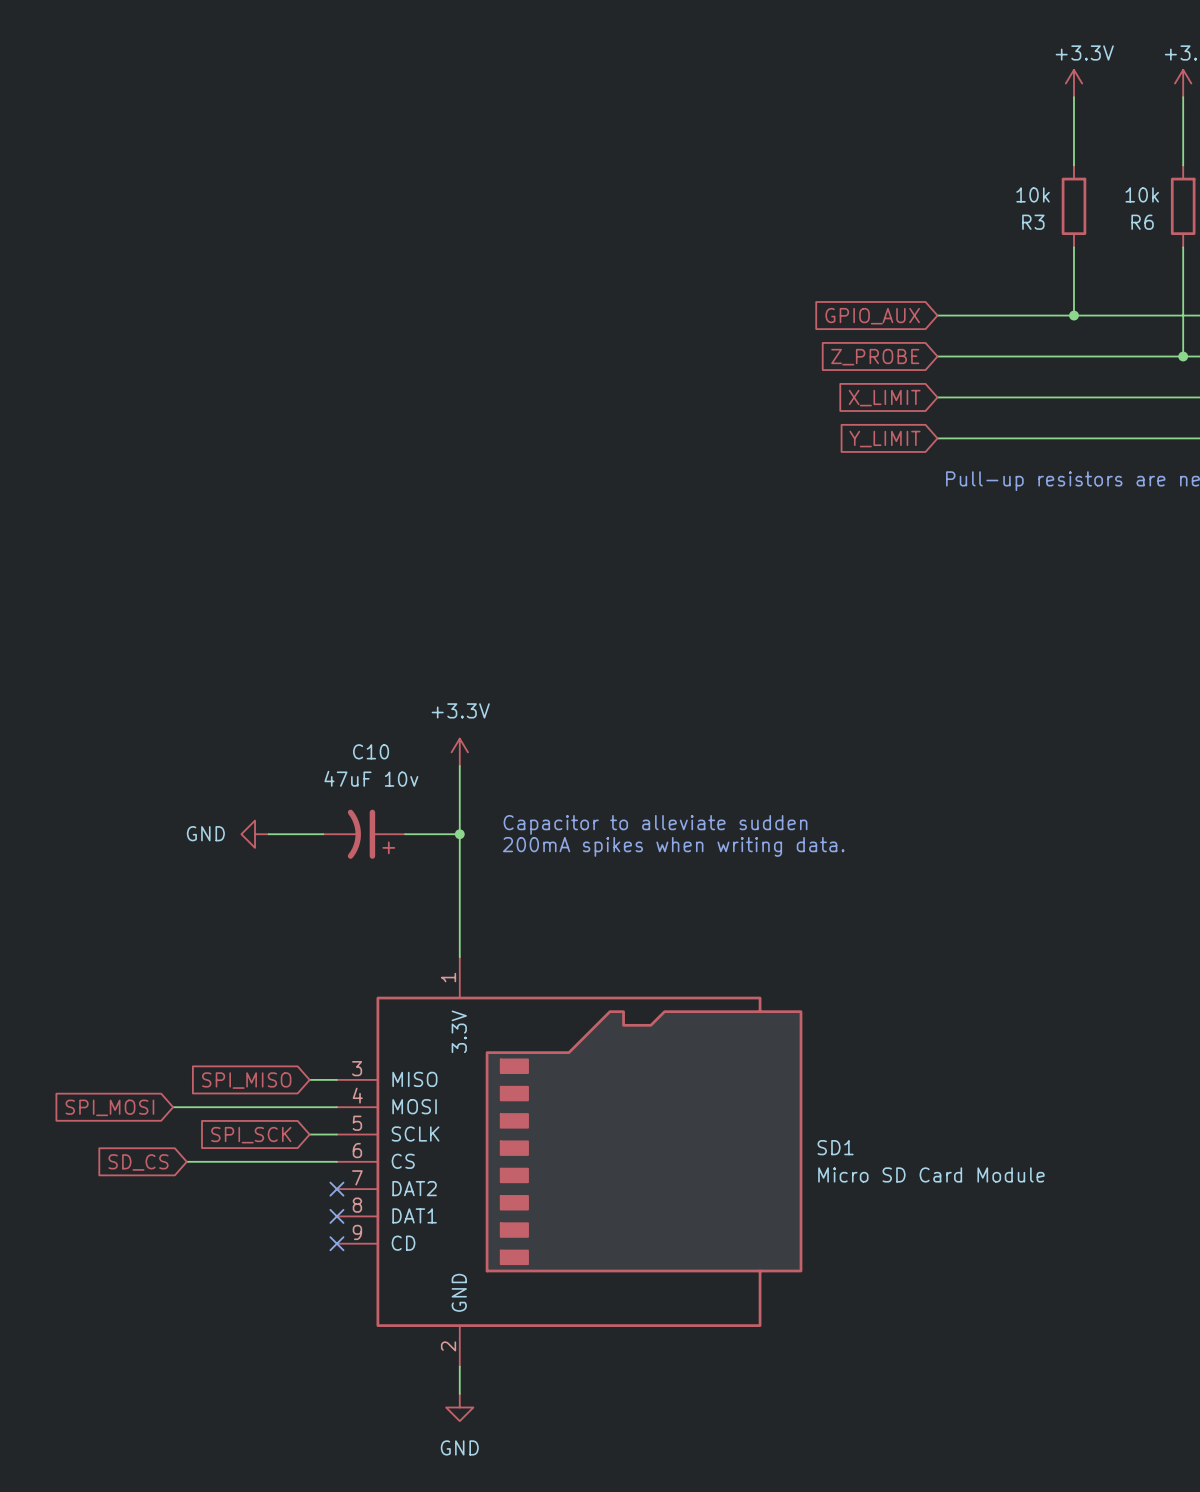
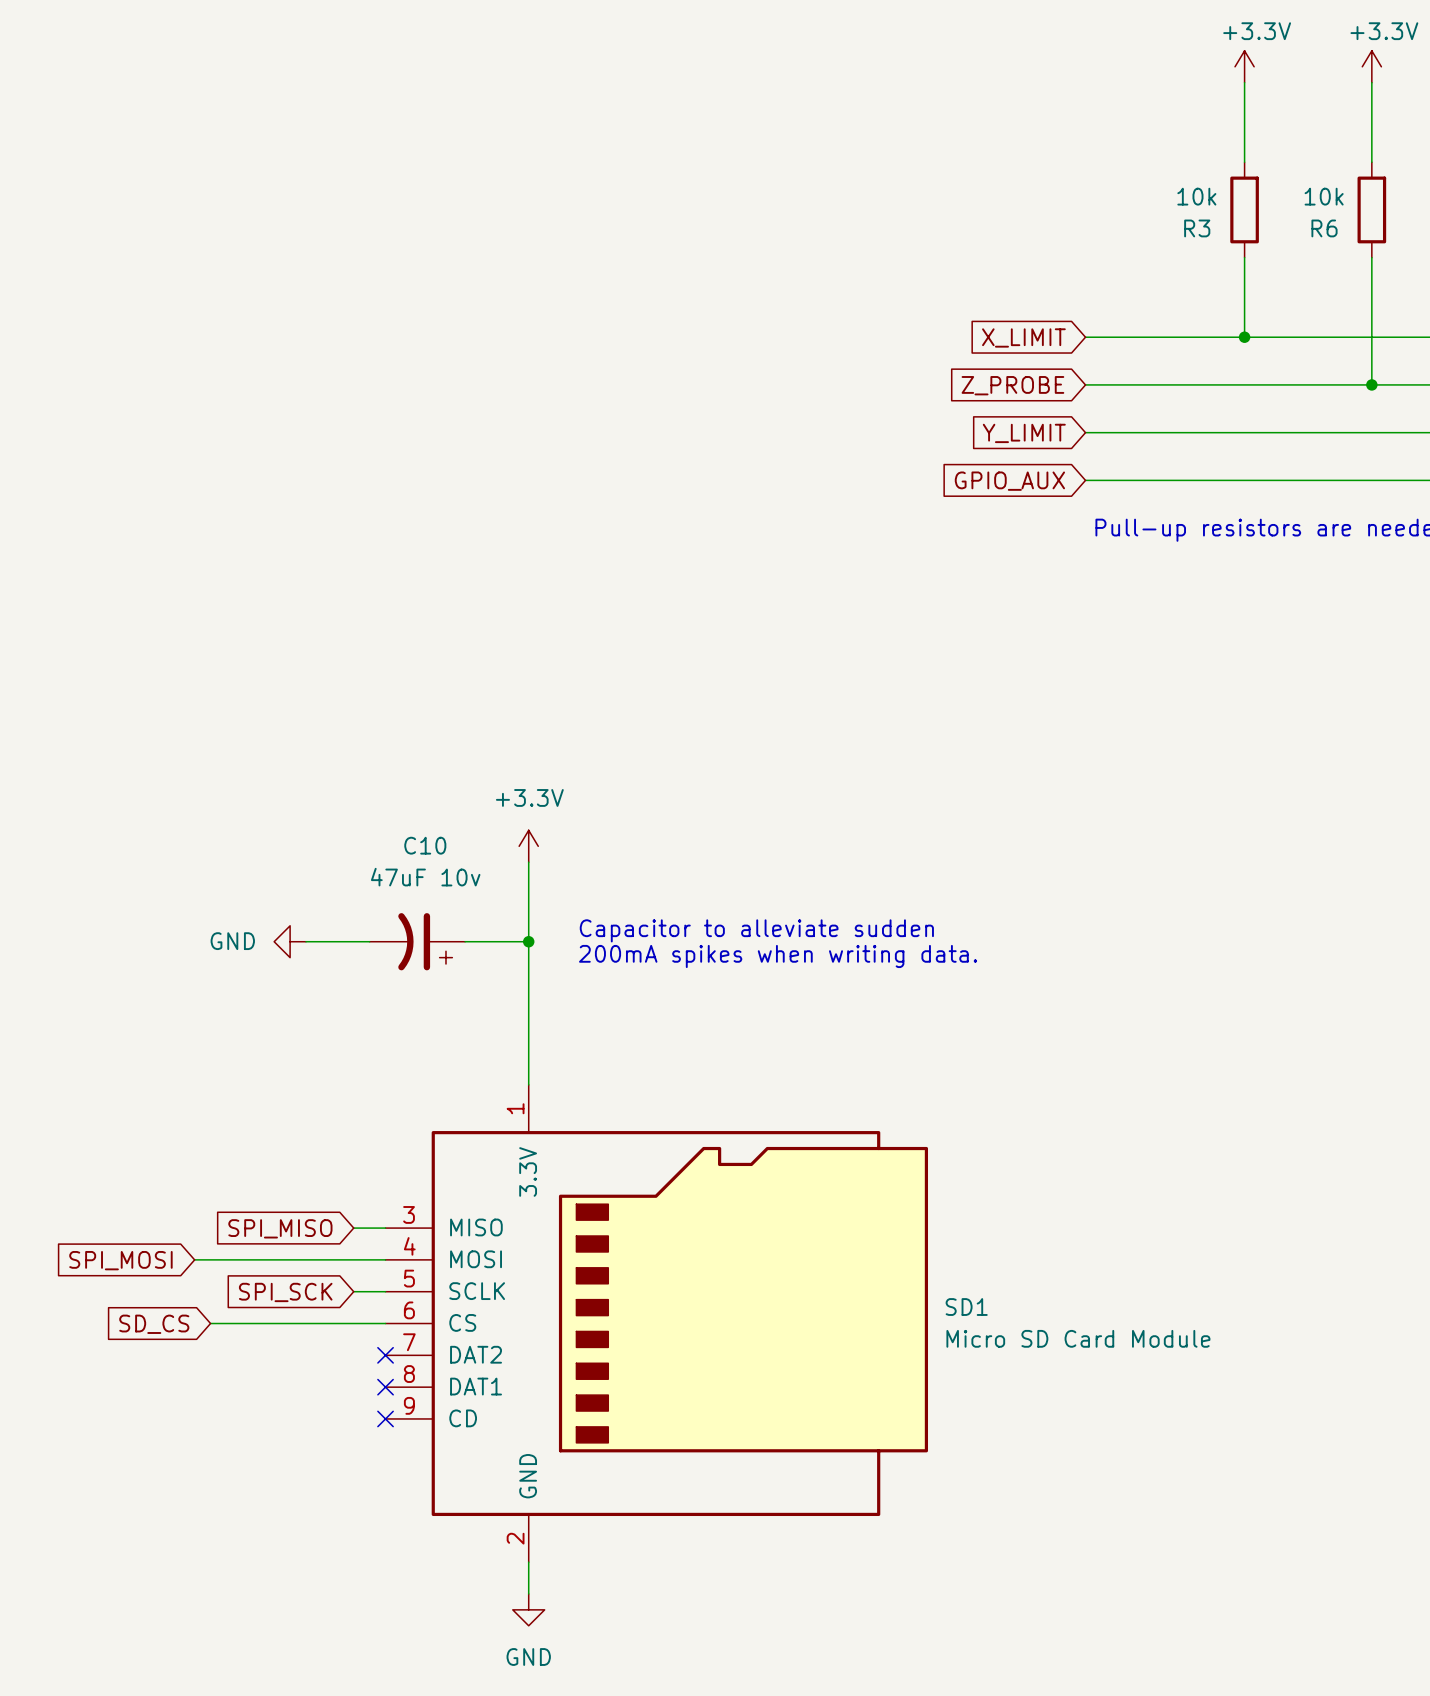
global label: GPIO_AUX (872, 316) -> X_LIMIT (1023, 337)
global label: X_LIMIT (884, 398) -> Y_LIMIT (1024, 433)
global label: Y_LIMIT (884, 439) -> GPIO_AUX (1009, 481)

